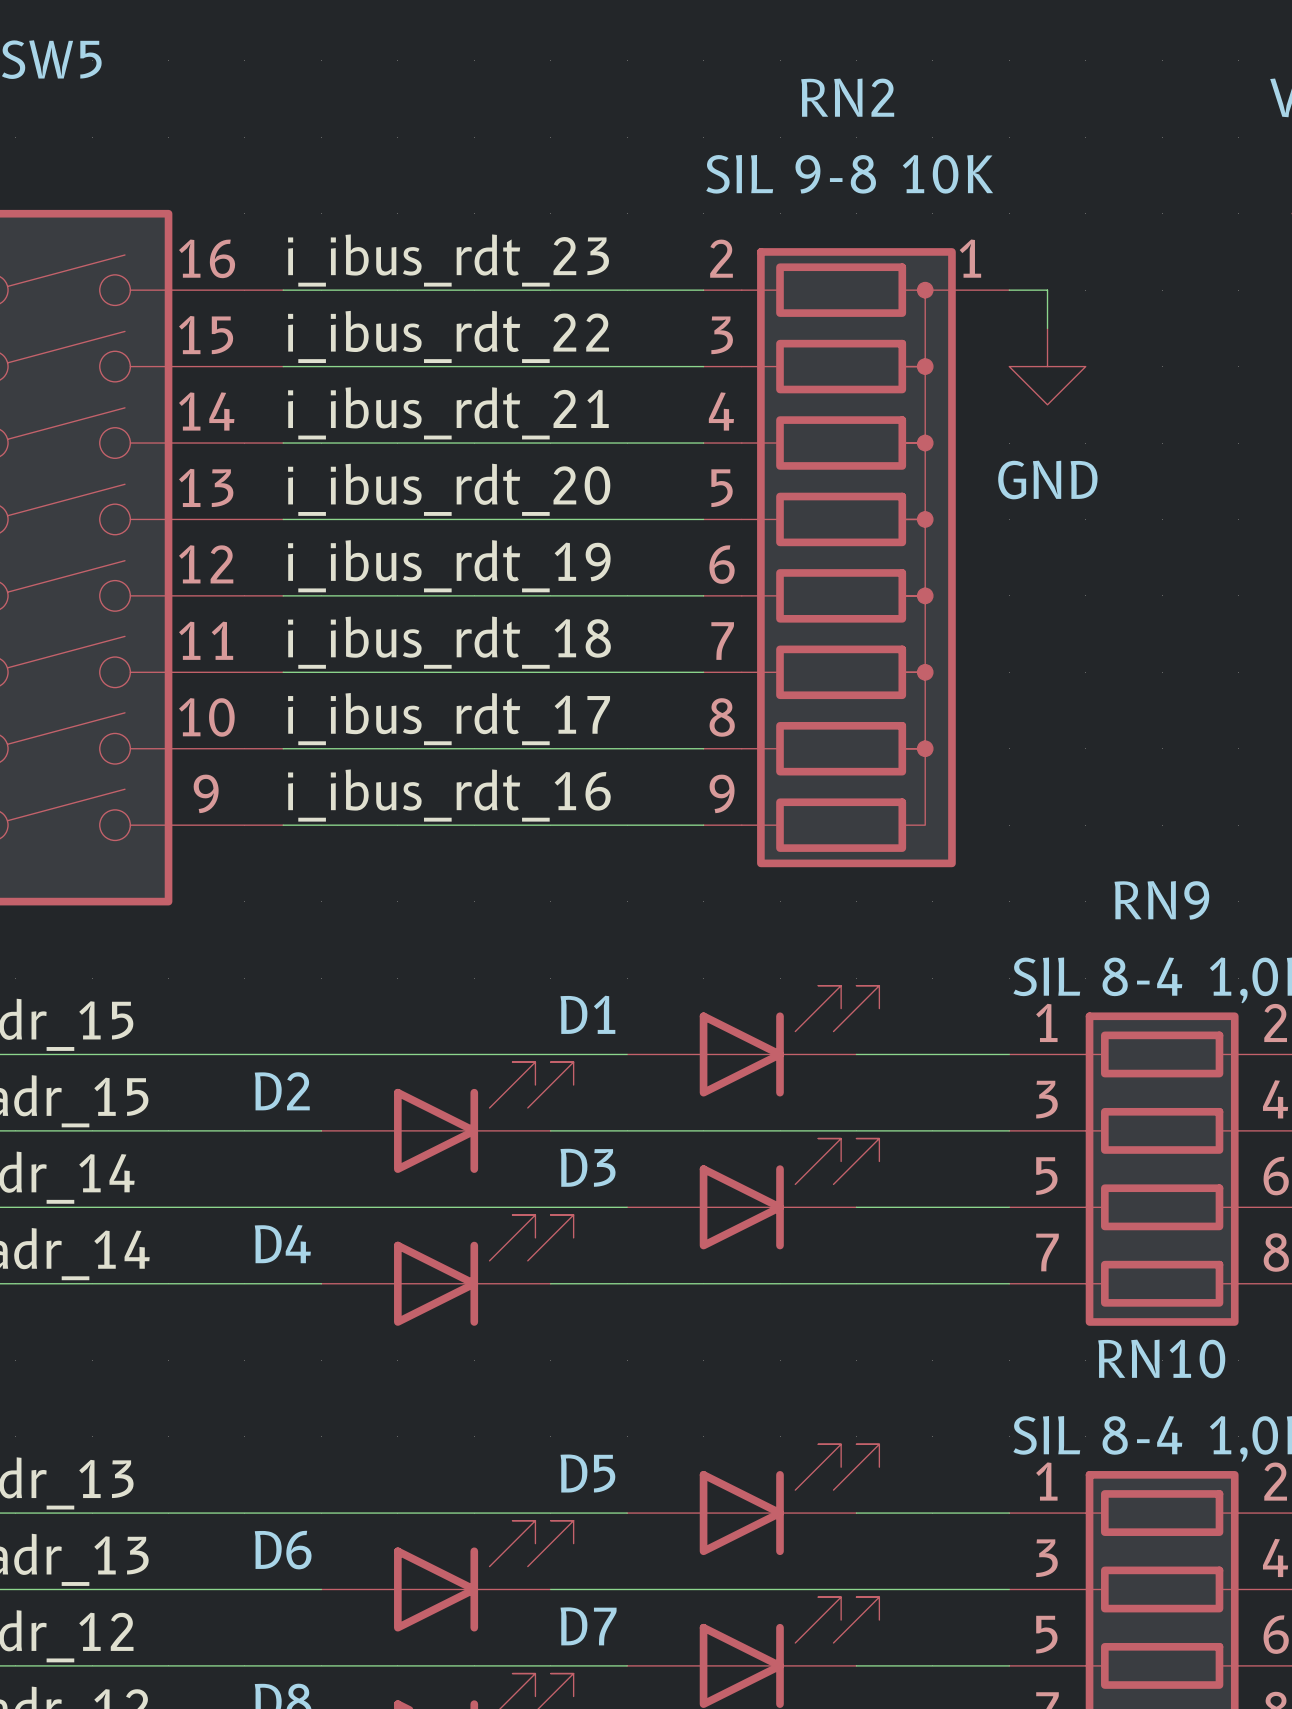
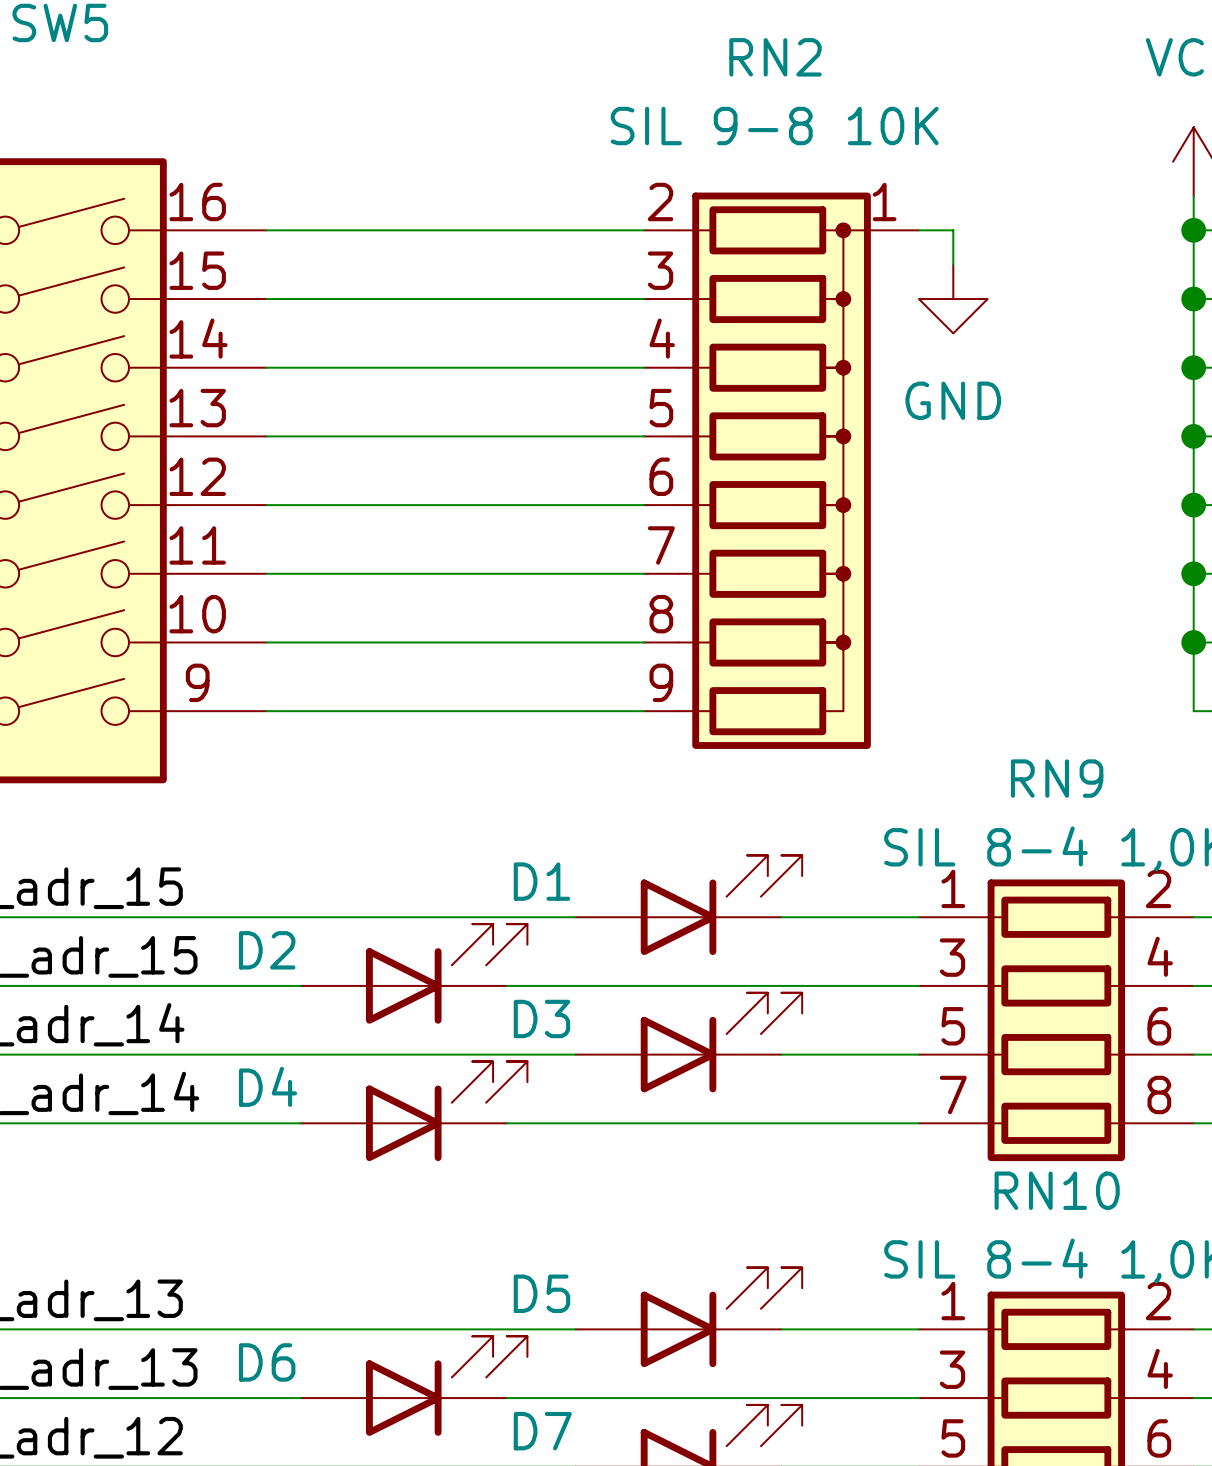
label: i_ibus_rdt_23 (448, 260) -> none
label: i_ibus_rdt_22 (448, 336) -> none
label: i_ibus_rdt_21 (448, 413) -> none
label: i_ibus_rdt_20 (449, 489) -> none
label: i_ibus_rdt_19 (449, 566) -> none
label: i_ibus_rdt_18 (449, 642) -> none
label: i_ibus_rdt_17 (449, 719) -> none
label: i_ibus_rdt_16 (449, 795) -> none

